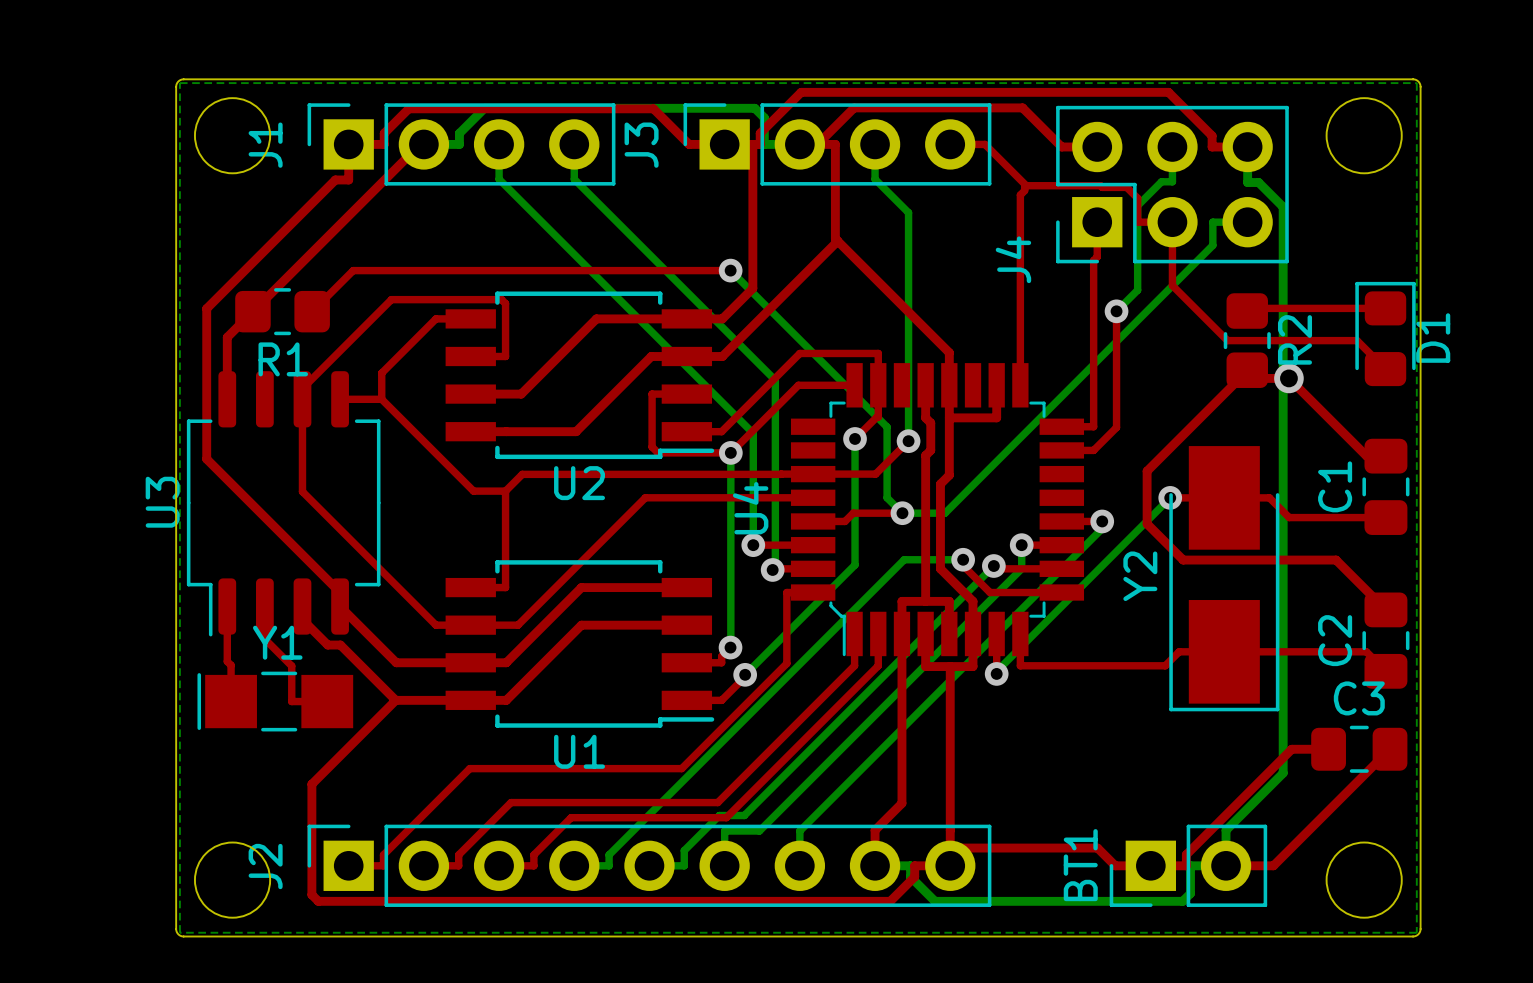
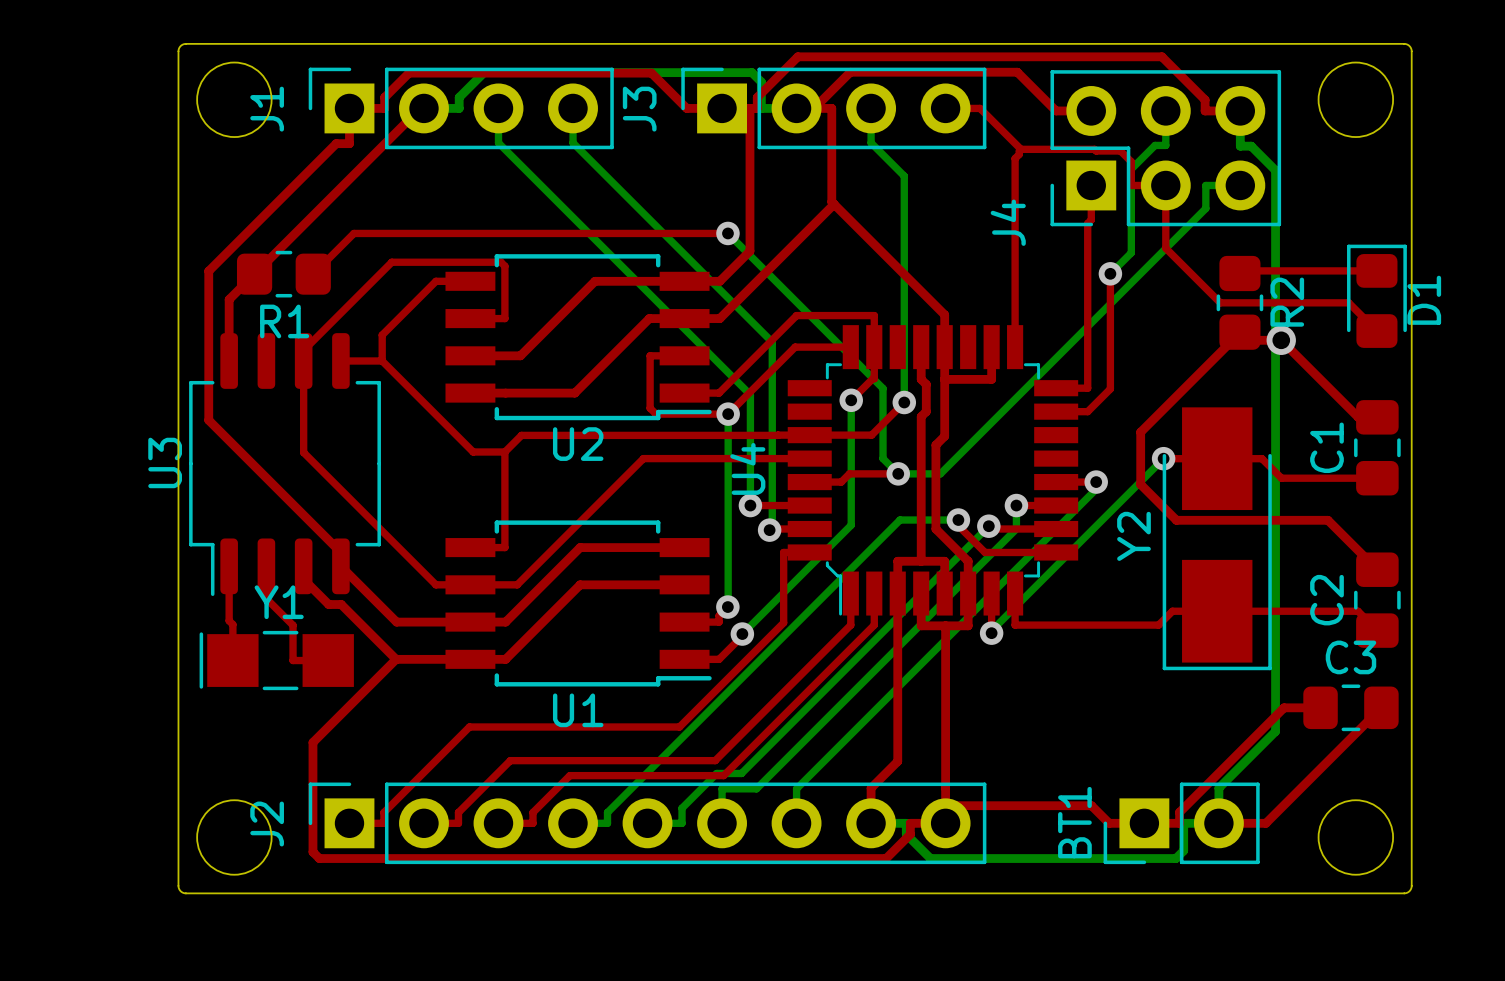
bottom zone outline: (179, 83) (179, 932) (1416, 932) (1416, 83) (179, 83) -> none

